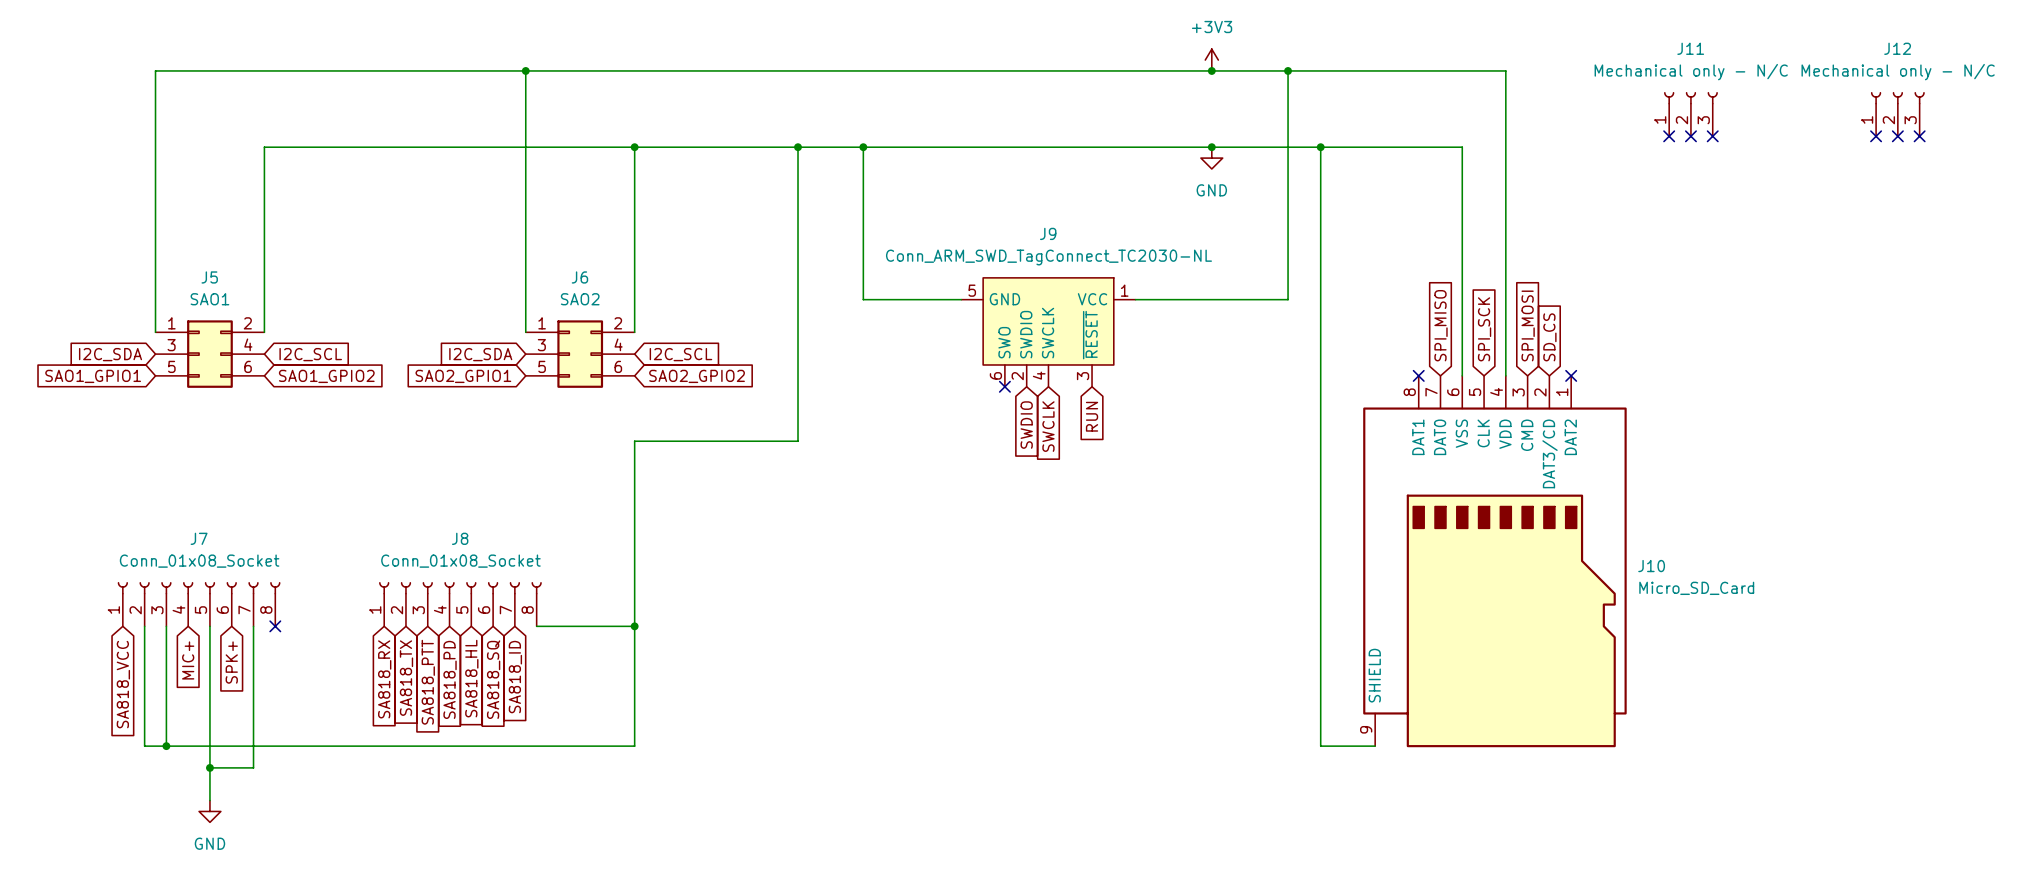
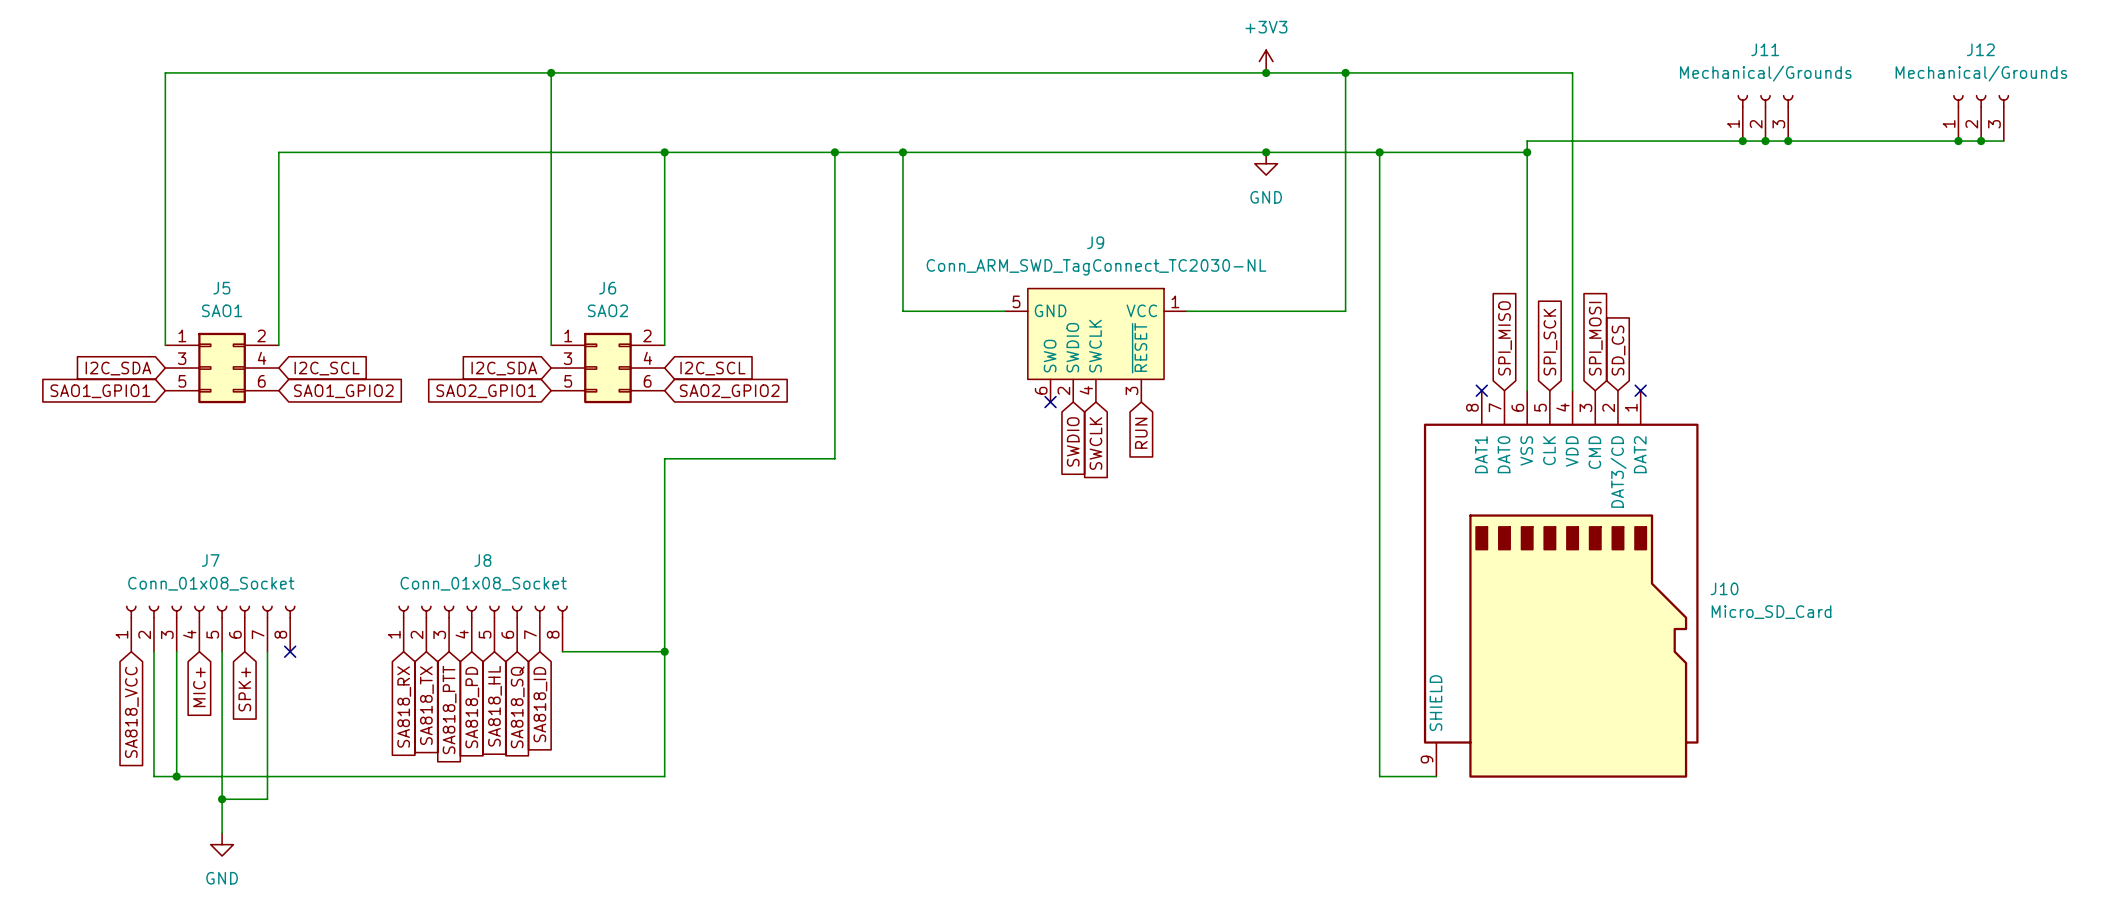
J11 value: Mechanical only - N/C (1691, 72) -> Mechanical/Grounds (1765, 73)
J12 value: Mechanical only - N/C (1898, 72) -> Mechanical/Grounds (1981, 73)
no-connect mark: (1669, 136) -> none
junction: none -> (1742, 141)
no-connect mark: (1690, 136) -> none
junction: none -> (1765, 141)
no-connect mark: (1712, 136) -> none
junction: none -> (1788, 141)
no-connect mark: (1876, 136) -> none
junction: none -> (1958, 141)
no-connect mark: (1897, 136) -> none
junction: none -> (1981, 141)
wire: none -> (2003, 141) (1527, 141) (1527, 152)
no-connect mark: (1919, 136) -> none
junction: none -> (1527, 152)

